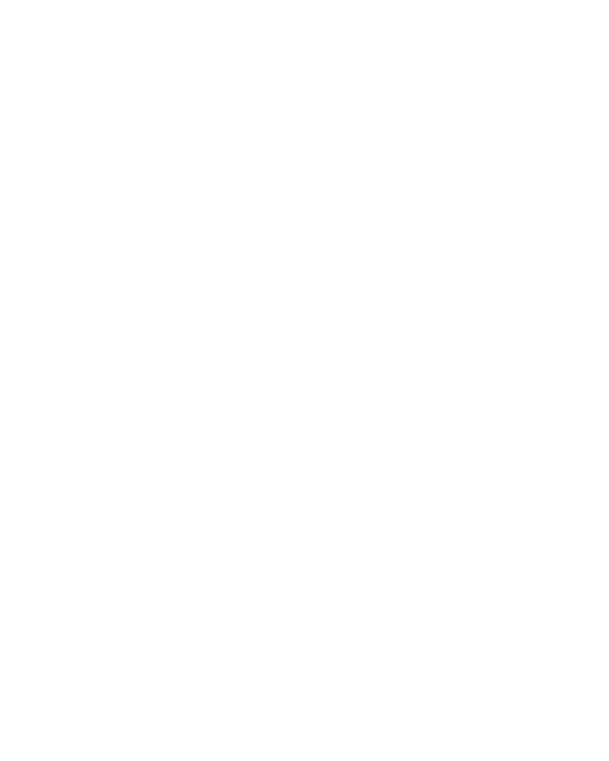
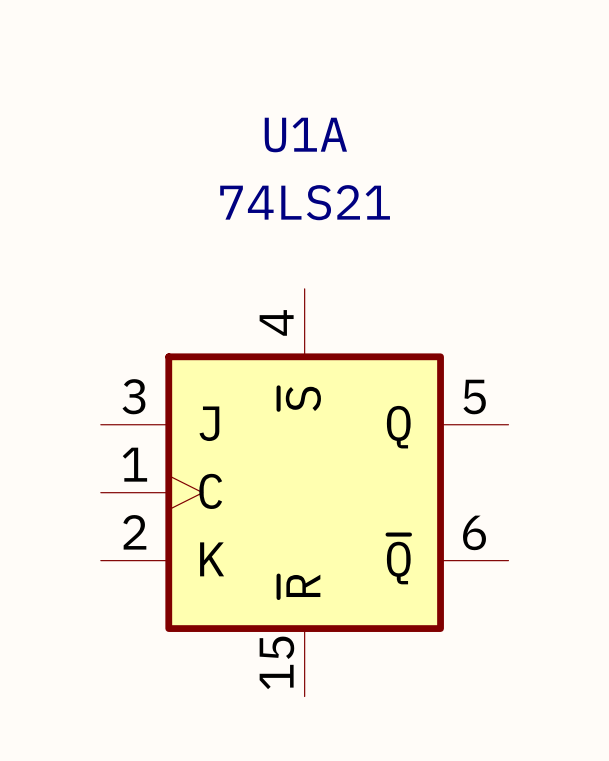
U1A: none -> 74LS21 (304, 492)

